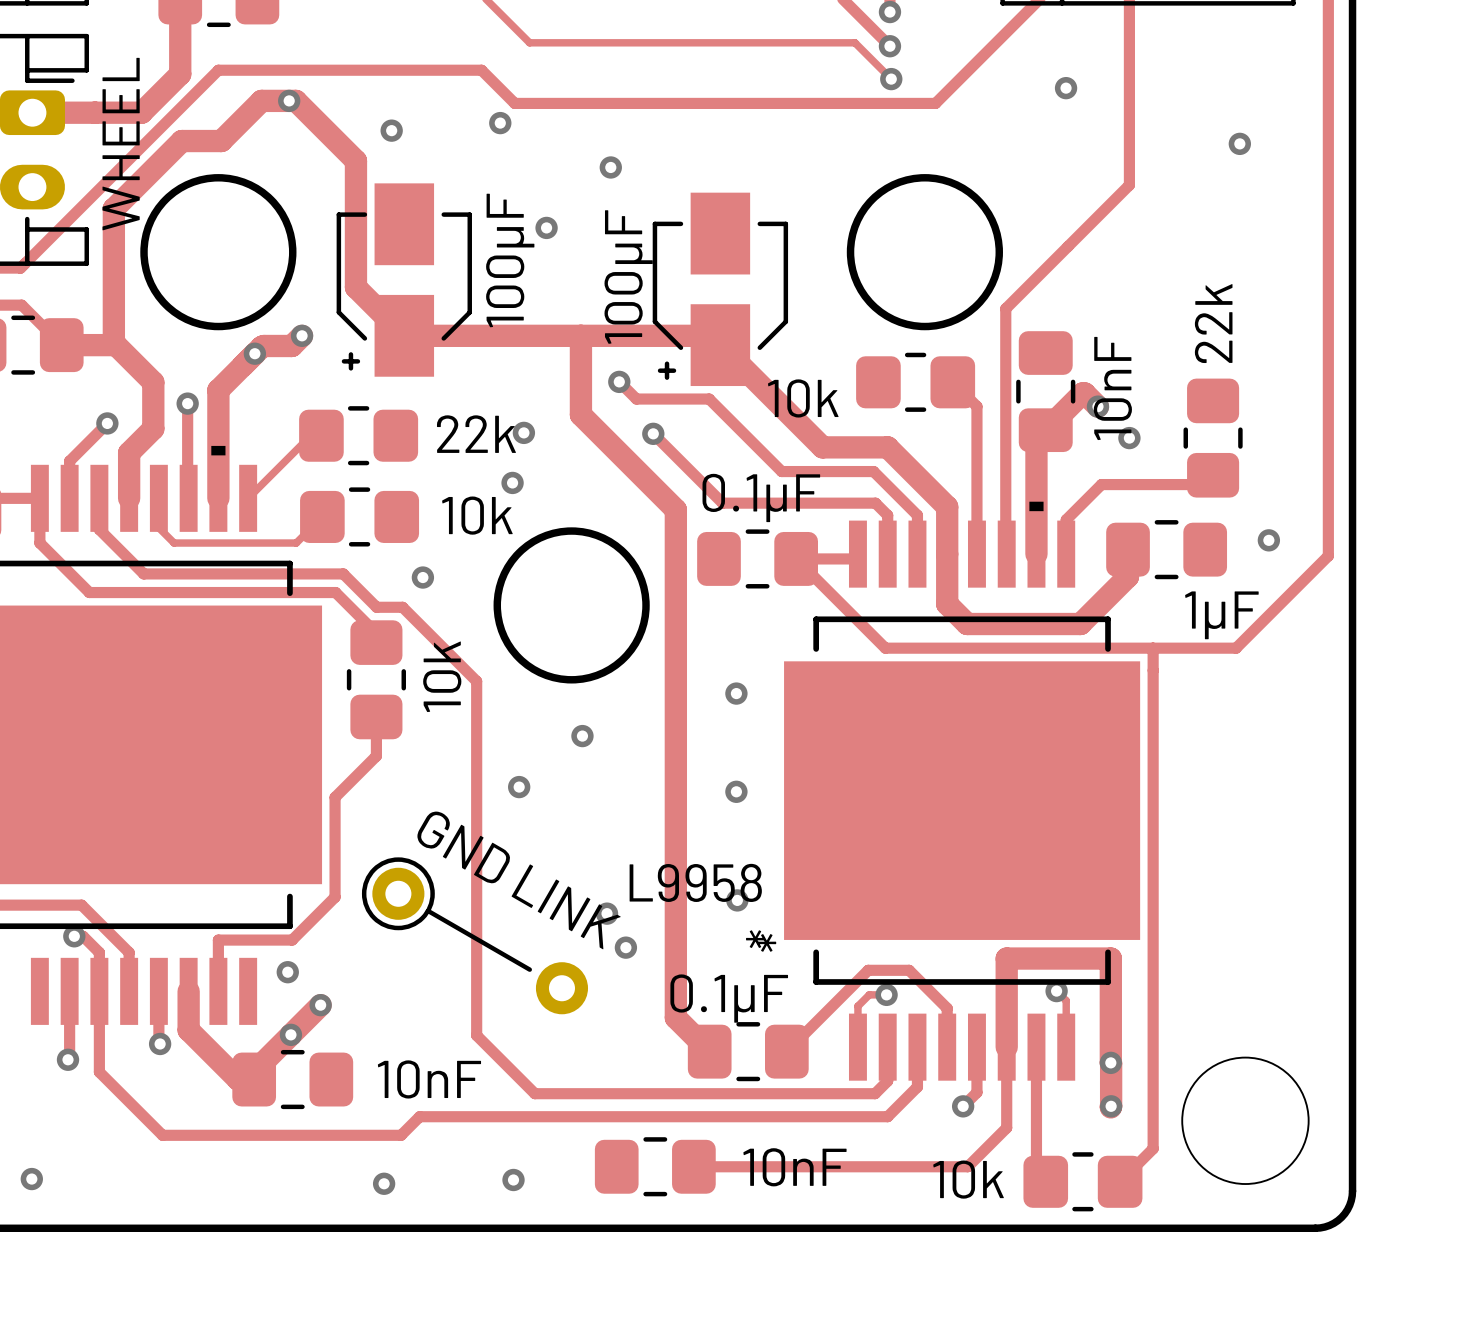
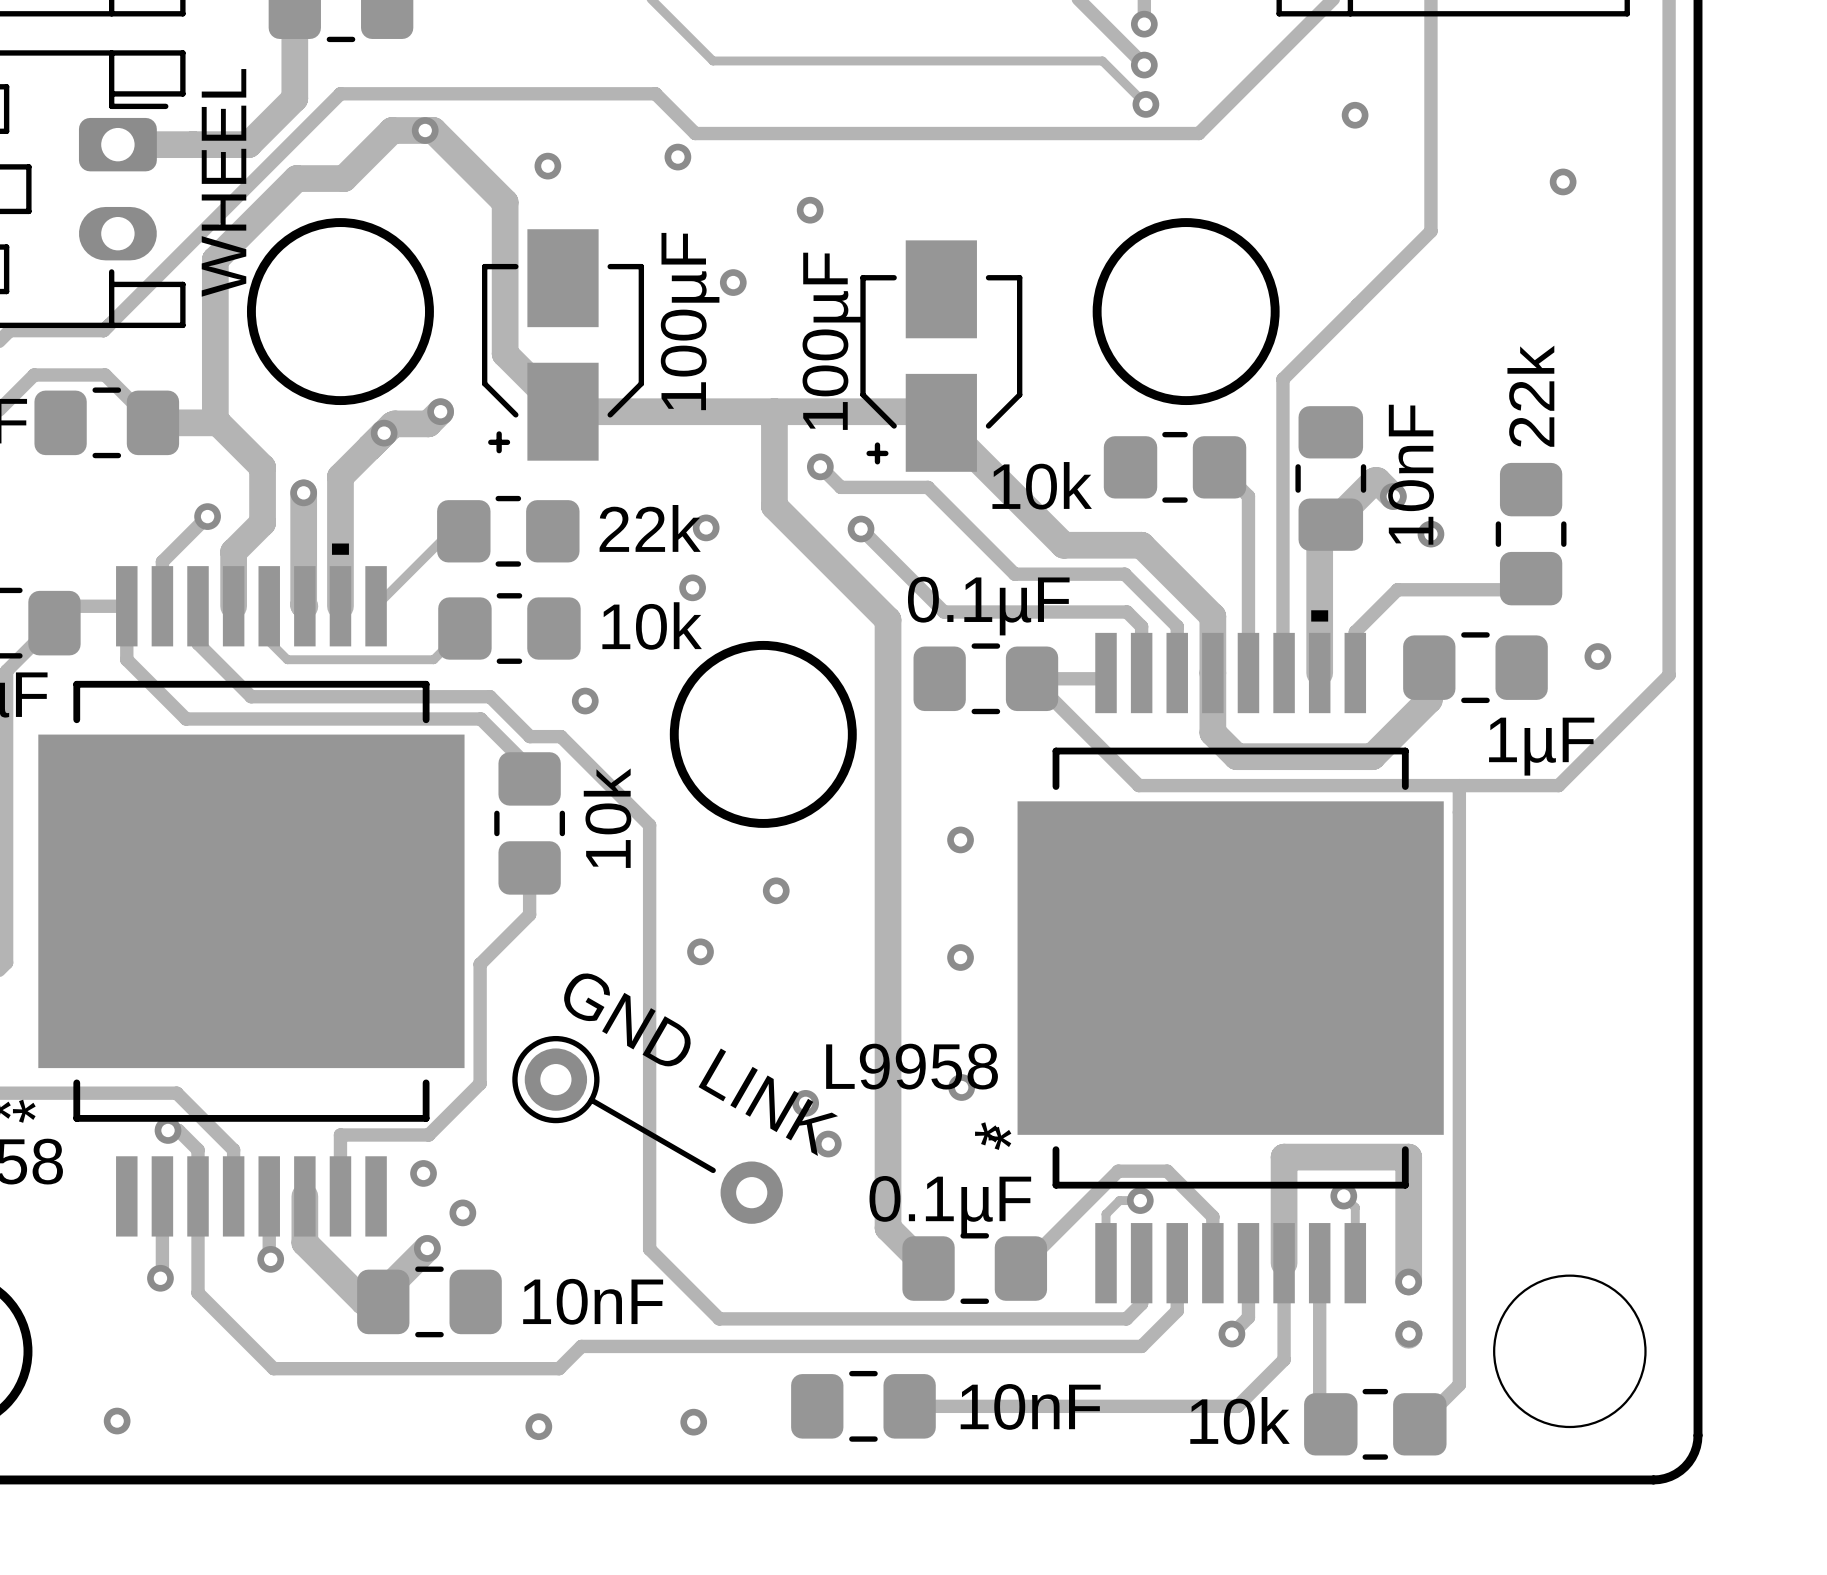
track width: thin (187, 403) (188, 498) -> thick (303, 492) (304, 606)
track: (320, 1005) (290, 1034) -> none
track: (1111, 1063) (1111, 1106) -> none

